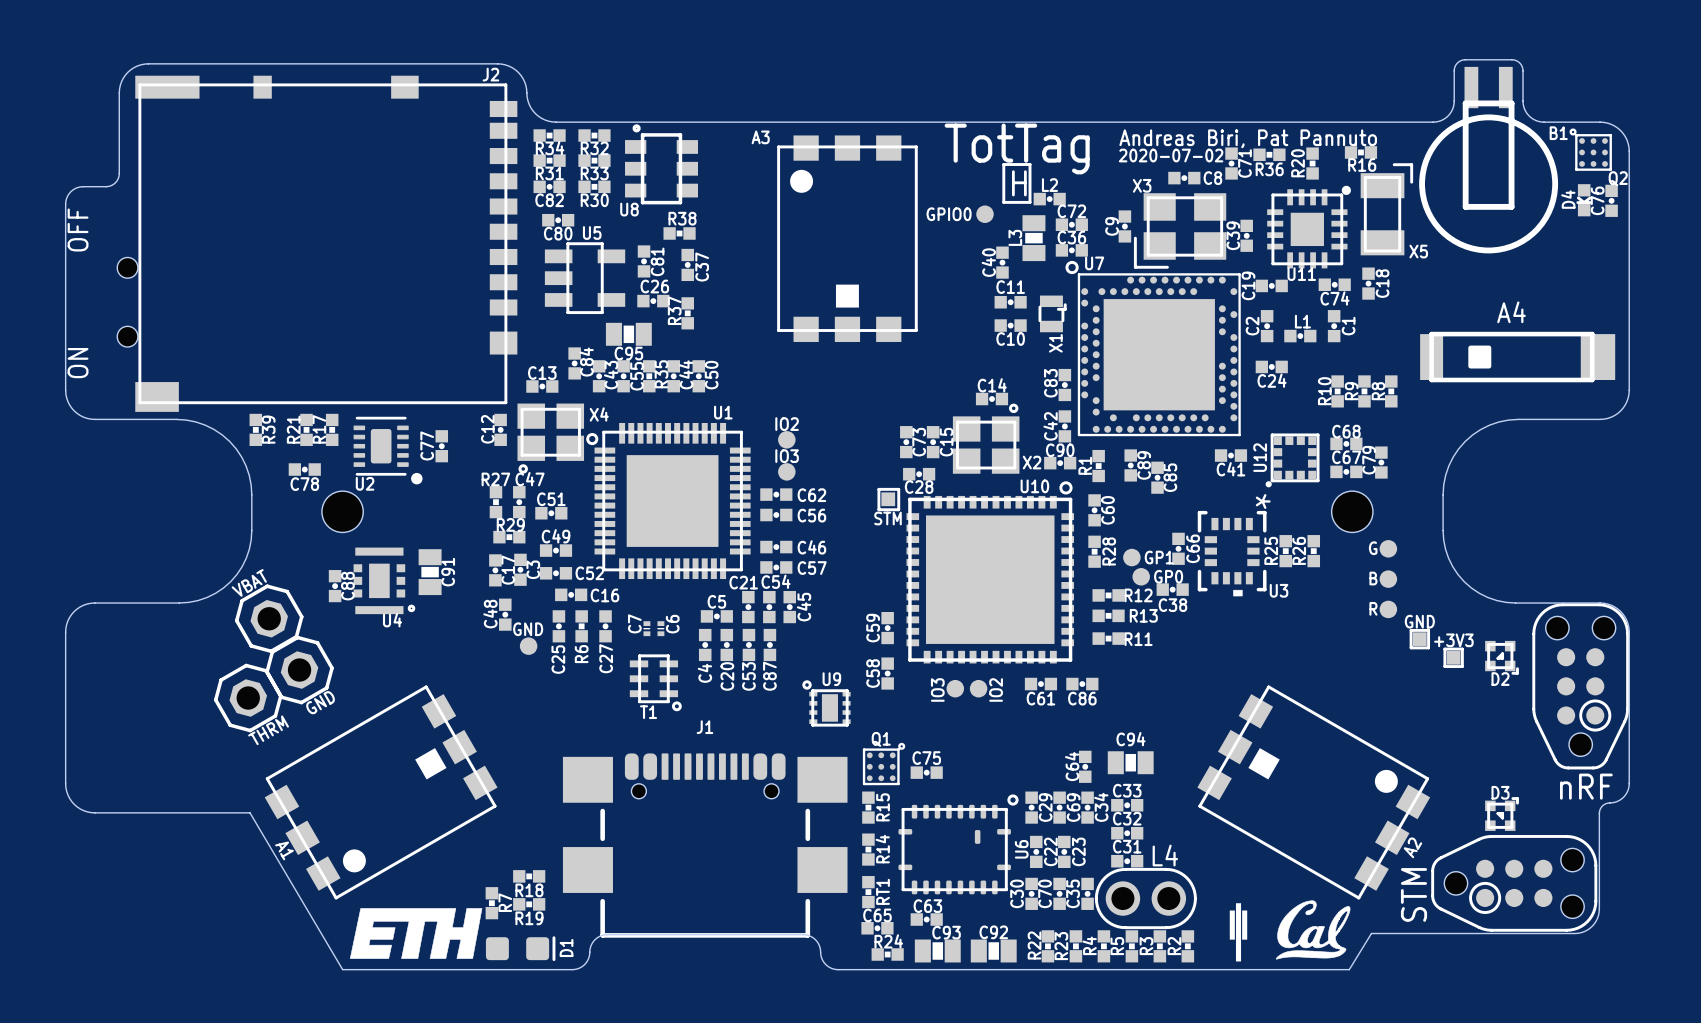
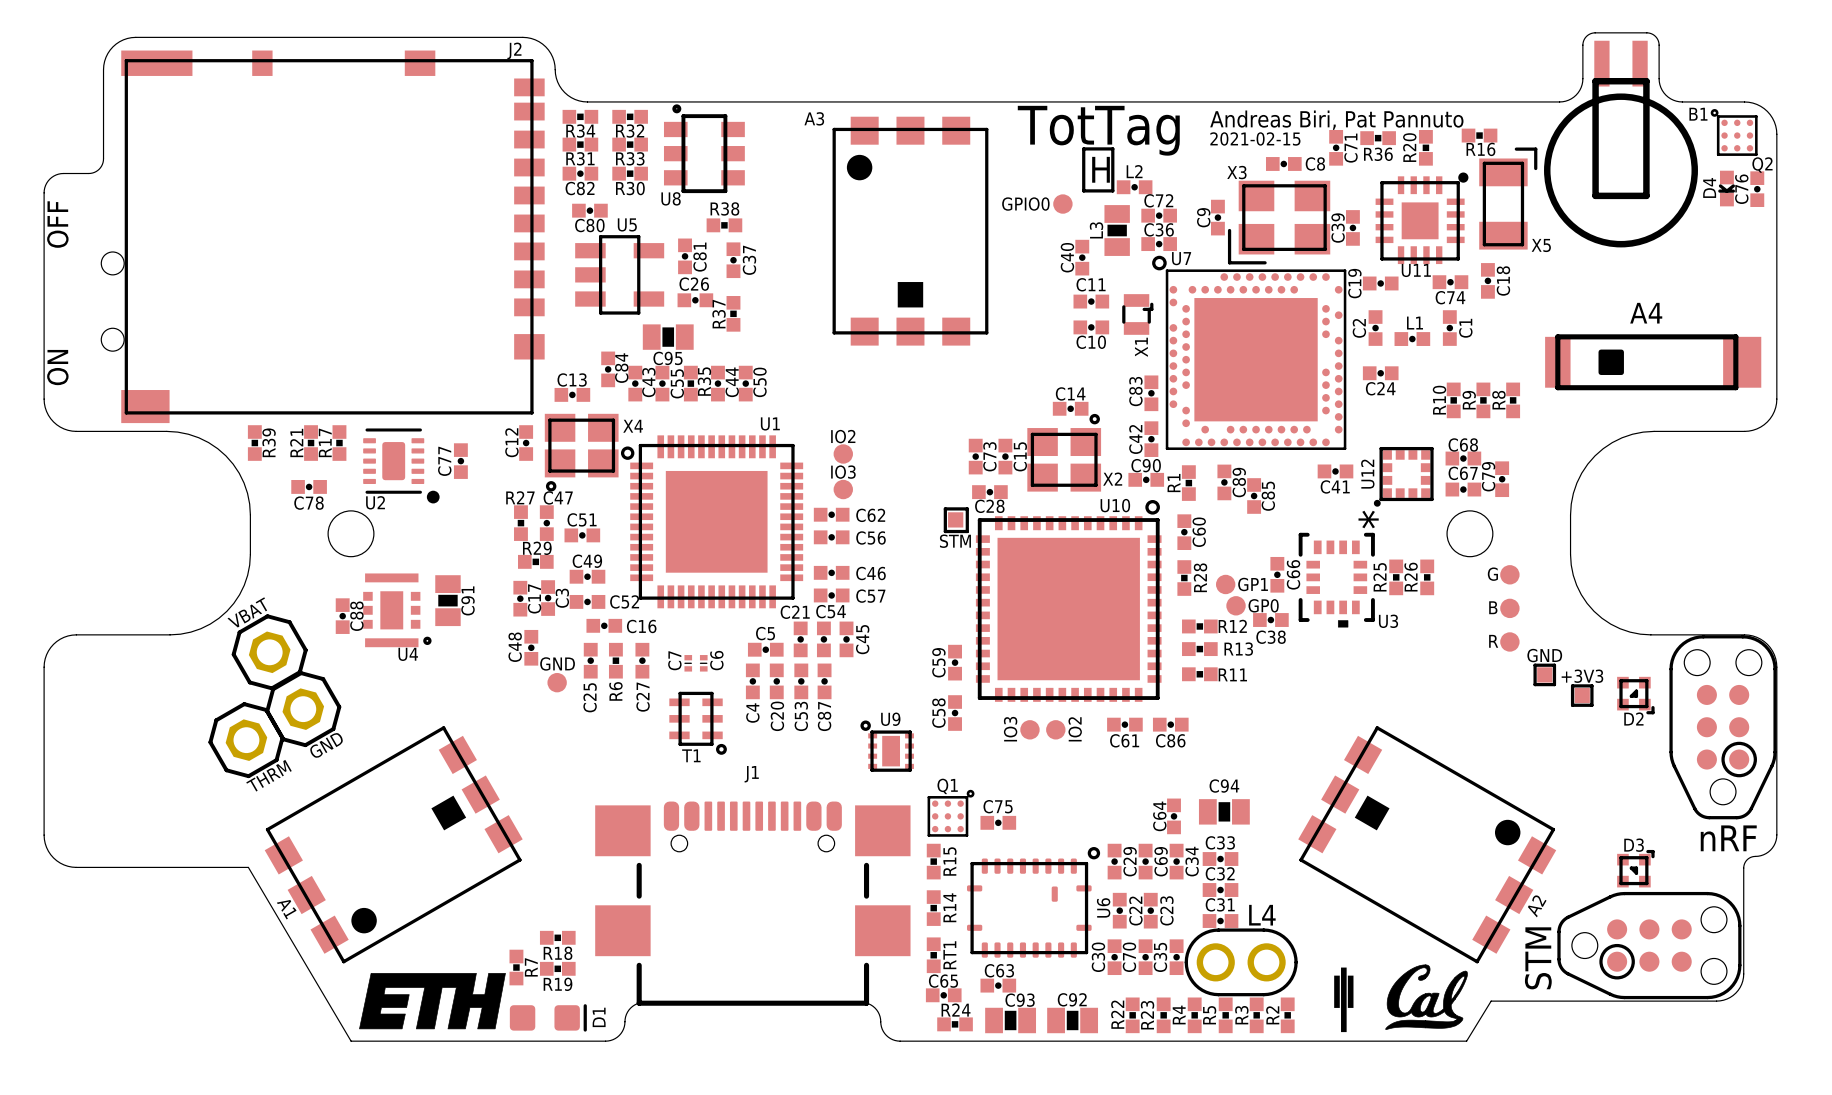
text: 2020-07-02 (1171, 155) -> 2021-02-15 (1255, 138)

